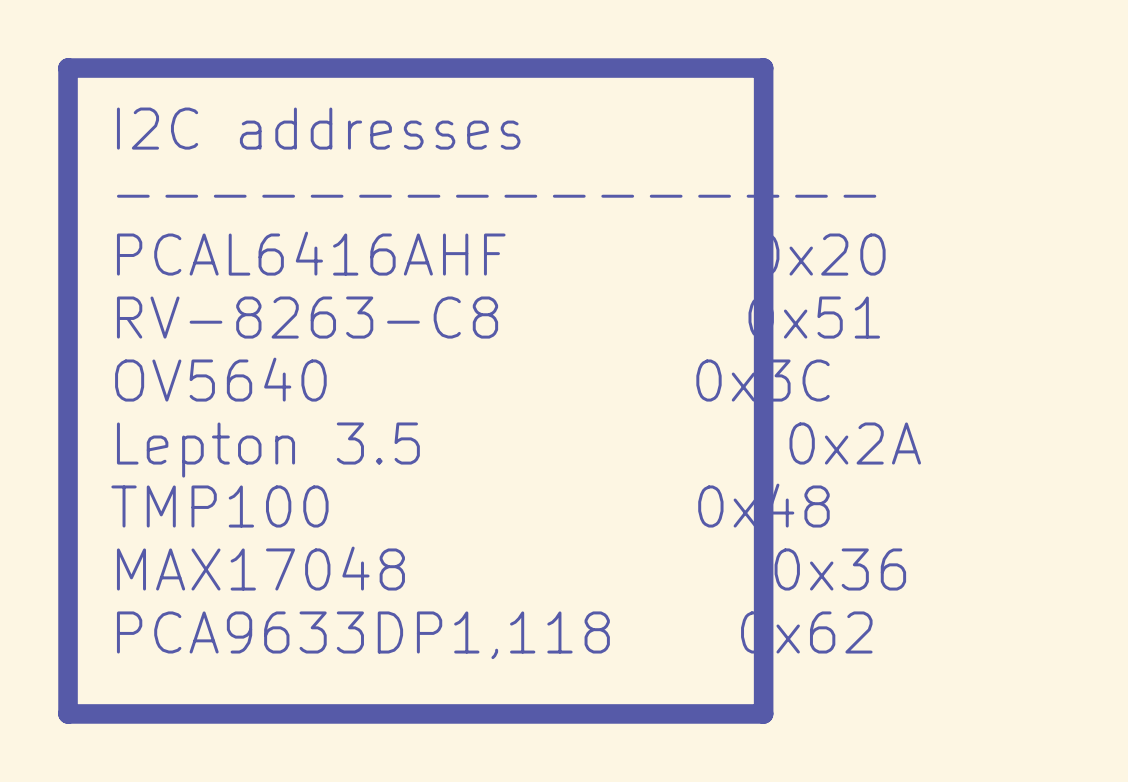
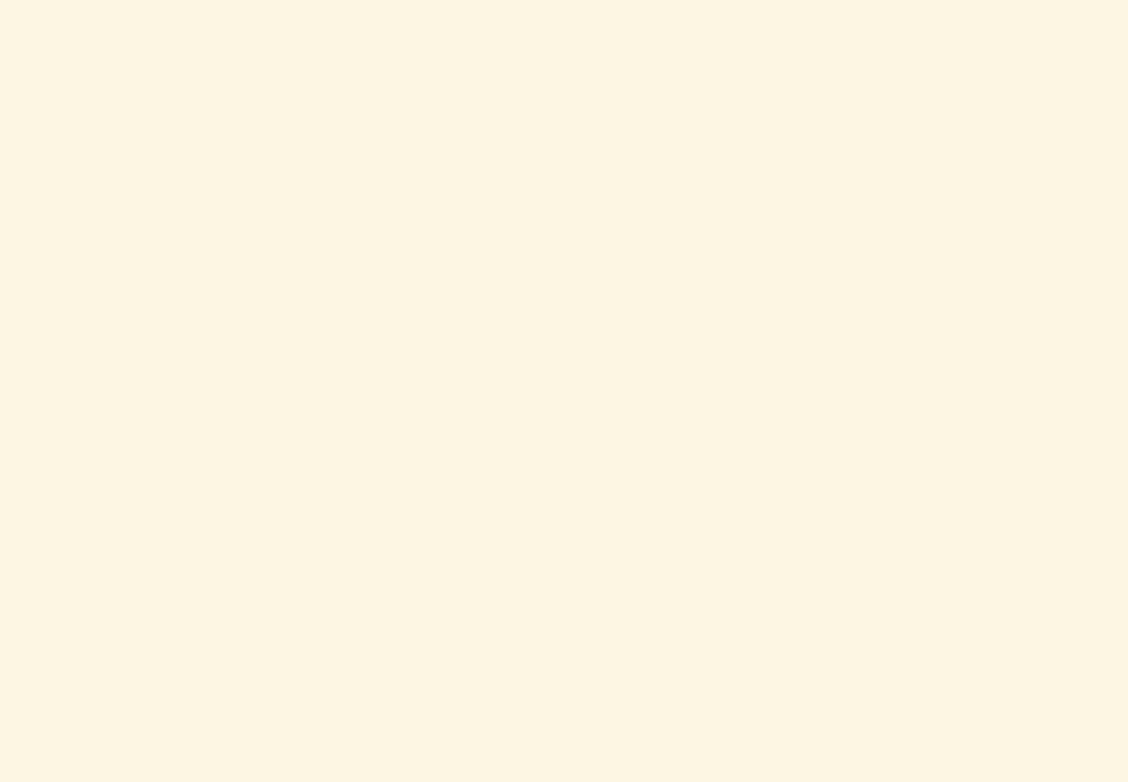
line: (68, 68) (763, 68) (763, 713) (68, 713) (68, 68) -> none
text: I2C addresses (318, 128) -> none
text: ---------------- (496, 196) -> none
text: PCAL6416AHF 0x20 (501, 253) -> none
text: RV-8263-C8 0x51 (498, 317) -> none
text: OV5640 0x3C (472, 379) -> none
text: Lepton 3.5 0x2A (518, 450) -> none
text: TMP100 0x48 (470, 505) -> none
text: MAX17048 0x36 (511, 568) -> none
text: PCA9633DP1,118 0x62 (494, 635) -> none

